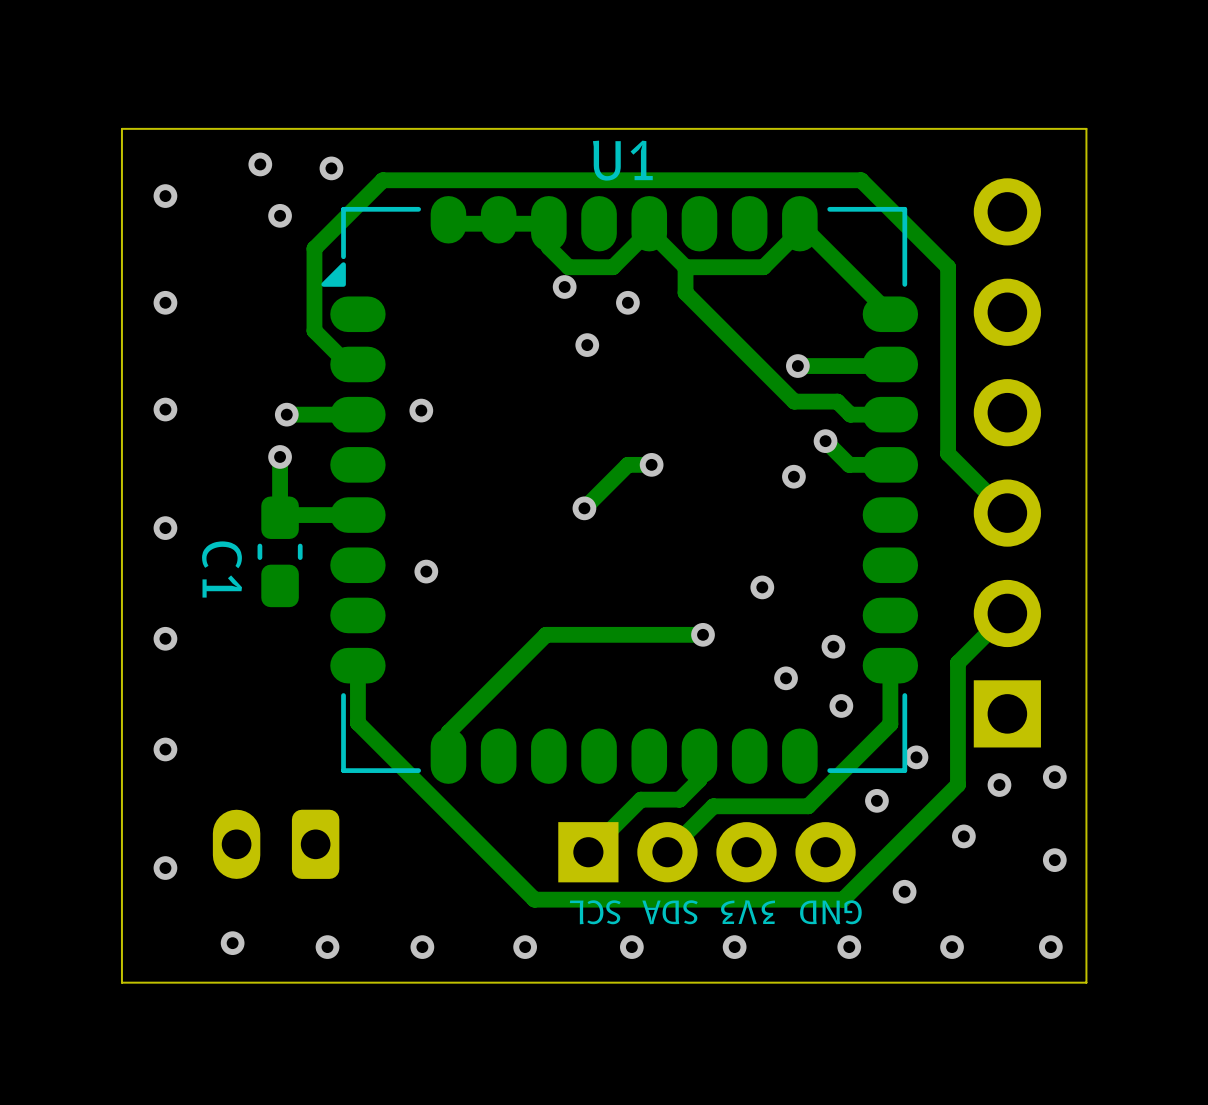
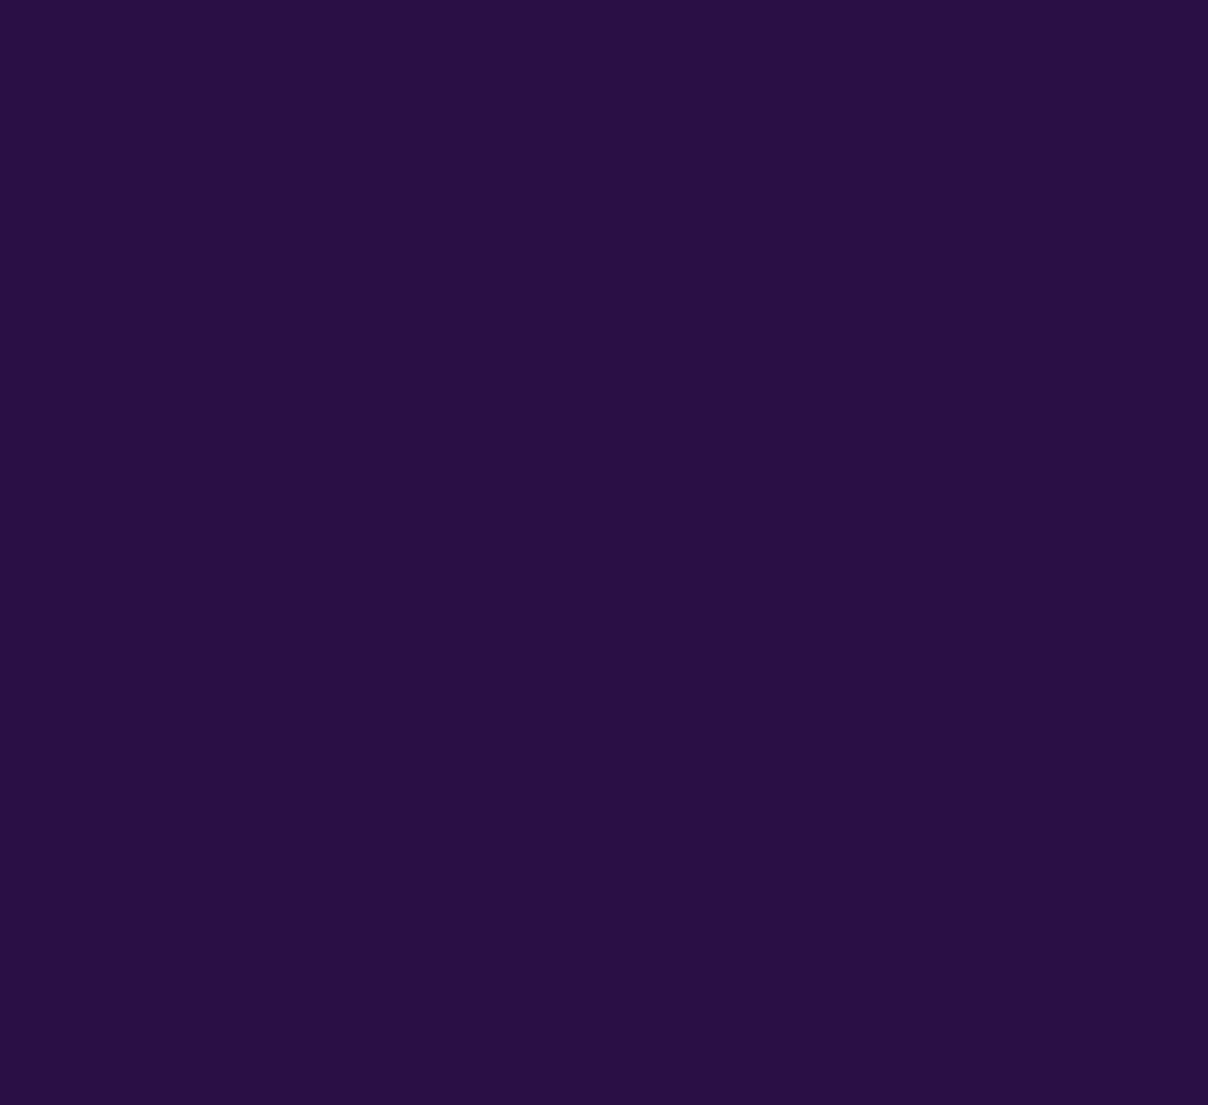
board edge: (1086, 128) (121, 128) (121, 982) (1086, 982) (1086, 128) -> none
via: (260, 164) -> none
via: (331, 168) -> none
via: (165, 196) -> none
via: (280, 215) -> none
track: (448, 219) (452, 223) (548, 223) (548, 247) (568, 267) (612, 267) (649, 230) -> none
track: (649, 230) (685, 267) -> none
track: (685, 267) (685, 292) (794, 401) (837, 401) (850, 414) (890, 414) -> none
track: (685, 267) (763, 267) (799, 230) (799, 223) (890, 314) -> none
via: (564, 286) -> none
via: (165, 302) -> none
via: (627, 302) -> none
via: (587, 345) -> none
track: (357, 364) (348, 364) (314, 330) (314, 248) (382, 180) (861, 180) (948, 267) (948, 453) (1007, 513) -> none
track: (890, 364) (888, 366) (797, 366) -> none
via: (797, 366) -> none
via: (165, 409) -> none
via: (421, 410) -> none
via: (286, 414) -> none
track: (357, 414) (286, 414) -> none
track: (825, 441) (849, 464) (890, 464) -> none
via: (825, 441) -> none
track: (280, 456) (280, 517) (282, 515) (357, 515) -> none
via: (280, 456) -> none
part: (1007, 462) -> none
track: (651, 464) (627, 464) (584, 508) -> none
via: (651, 464) -> none
via: (793, 476) -> none
U1: (619, 489) -> none
via: (584, 508) -> none
via: (165, 528) -> none
C1: (280, 551) -> none
via: (426, 571) -> none
via: (762, 587) -> none
track: (1007, 613) (957, 662) (957, 784) (843, 899) (534, 899) (357, 723) (357, 665) -> none
track: (703, 634) (546, 634) (448, 732) (448, 756) -> none
via: (703, 634) -> none
via: (165, 638) -> none
via: (833, 646) -> none
track: (890, 665) (890, 724) (808, 806) (713, 806) (667, 852) -> none
via: (786, 678) -> none
via: (841, 705) -> none
via: (165, 749) -> none
track: (699, 756) (699, 779) (679, 799) (640, 799) (588, 852) -> none
via: (916, 757) -> none
via: (1054, 777) -> none
via: (999, 785) -> none
via: (876, 800) -> none
via: (963, 836) -> none
part: (276, 844) -> none
part: (706, 852) -> none
via: (1054, 860) -> none
via: (165, 868) -> none
via: (904, 891) -> none
text: SCL (595, 912) -> none
text: SDA (670, 912) -> none
text: 3V3 (748, 912) -> none
text: GND (830, 912) -> none
via: (232, 943) -> none
via: (327, 947) -> none
via: (422, 947) -> none
via: (525, 947) -> none
via: (631, 947) -> none
via: (734, 947) -> none
via: (849, 947) -> none
via: (952, 947) -> none
via: (1050, 947) -> none

